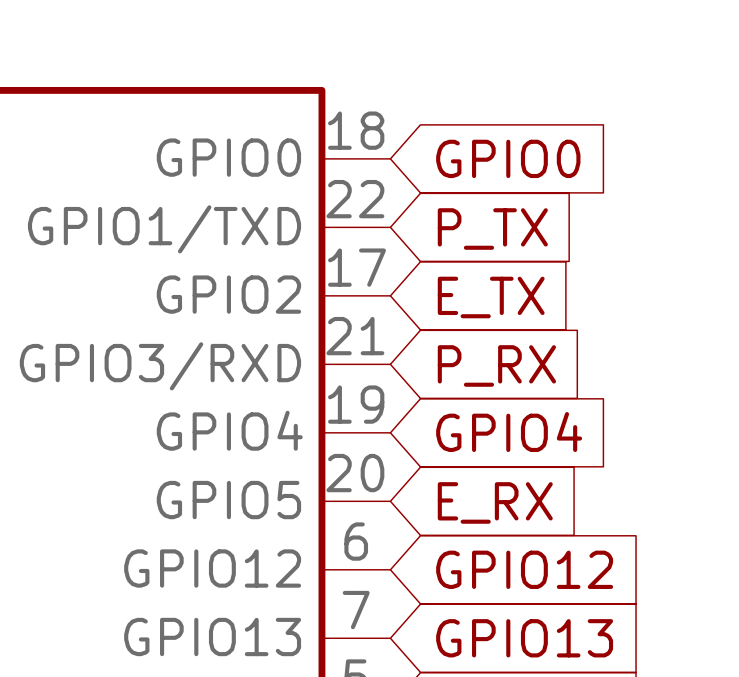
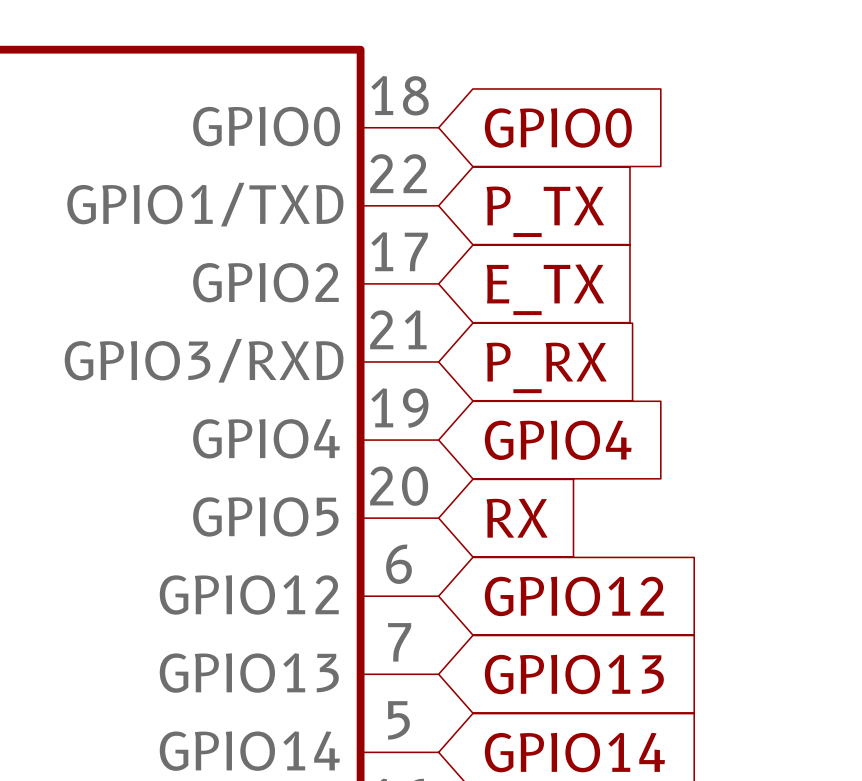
global label: E_RX (495, 502) -> RX (517, 518)

